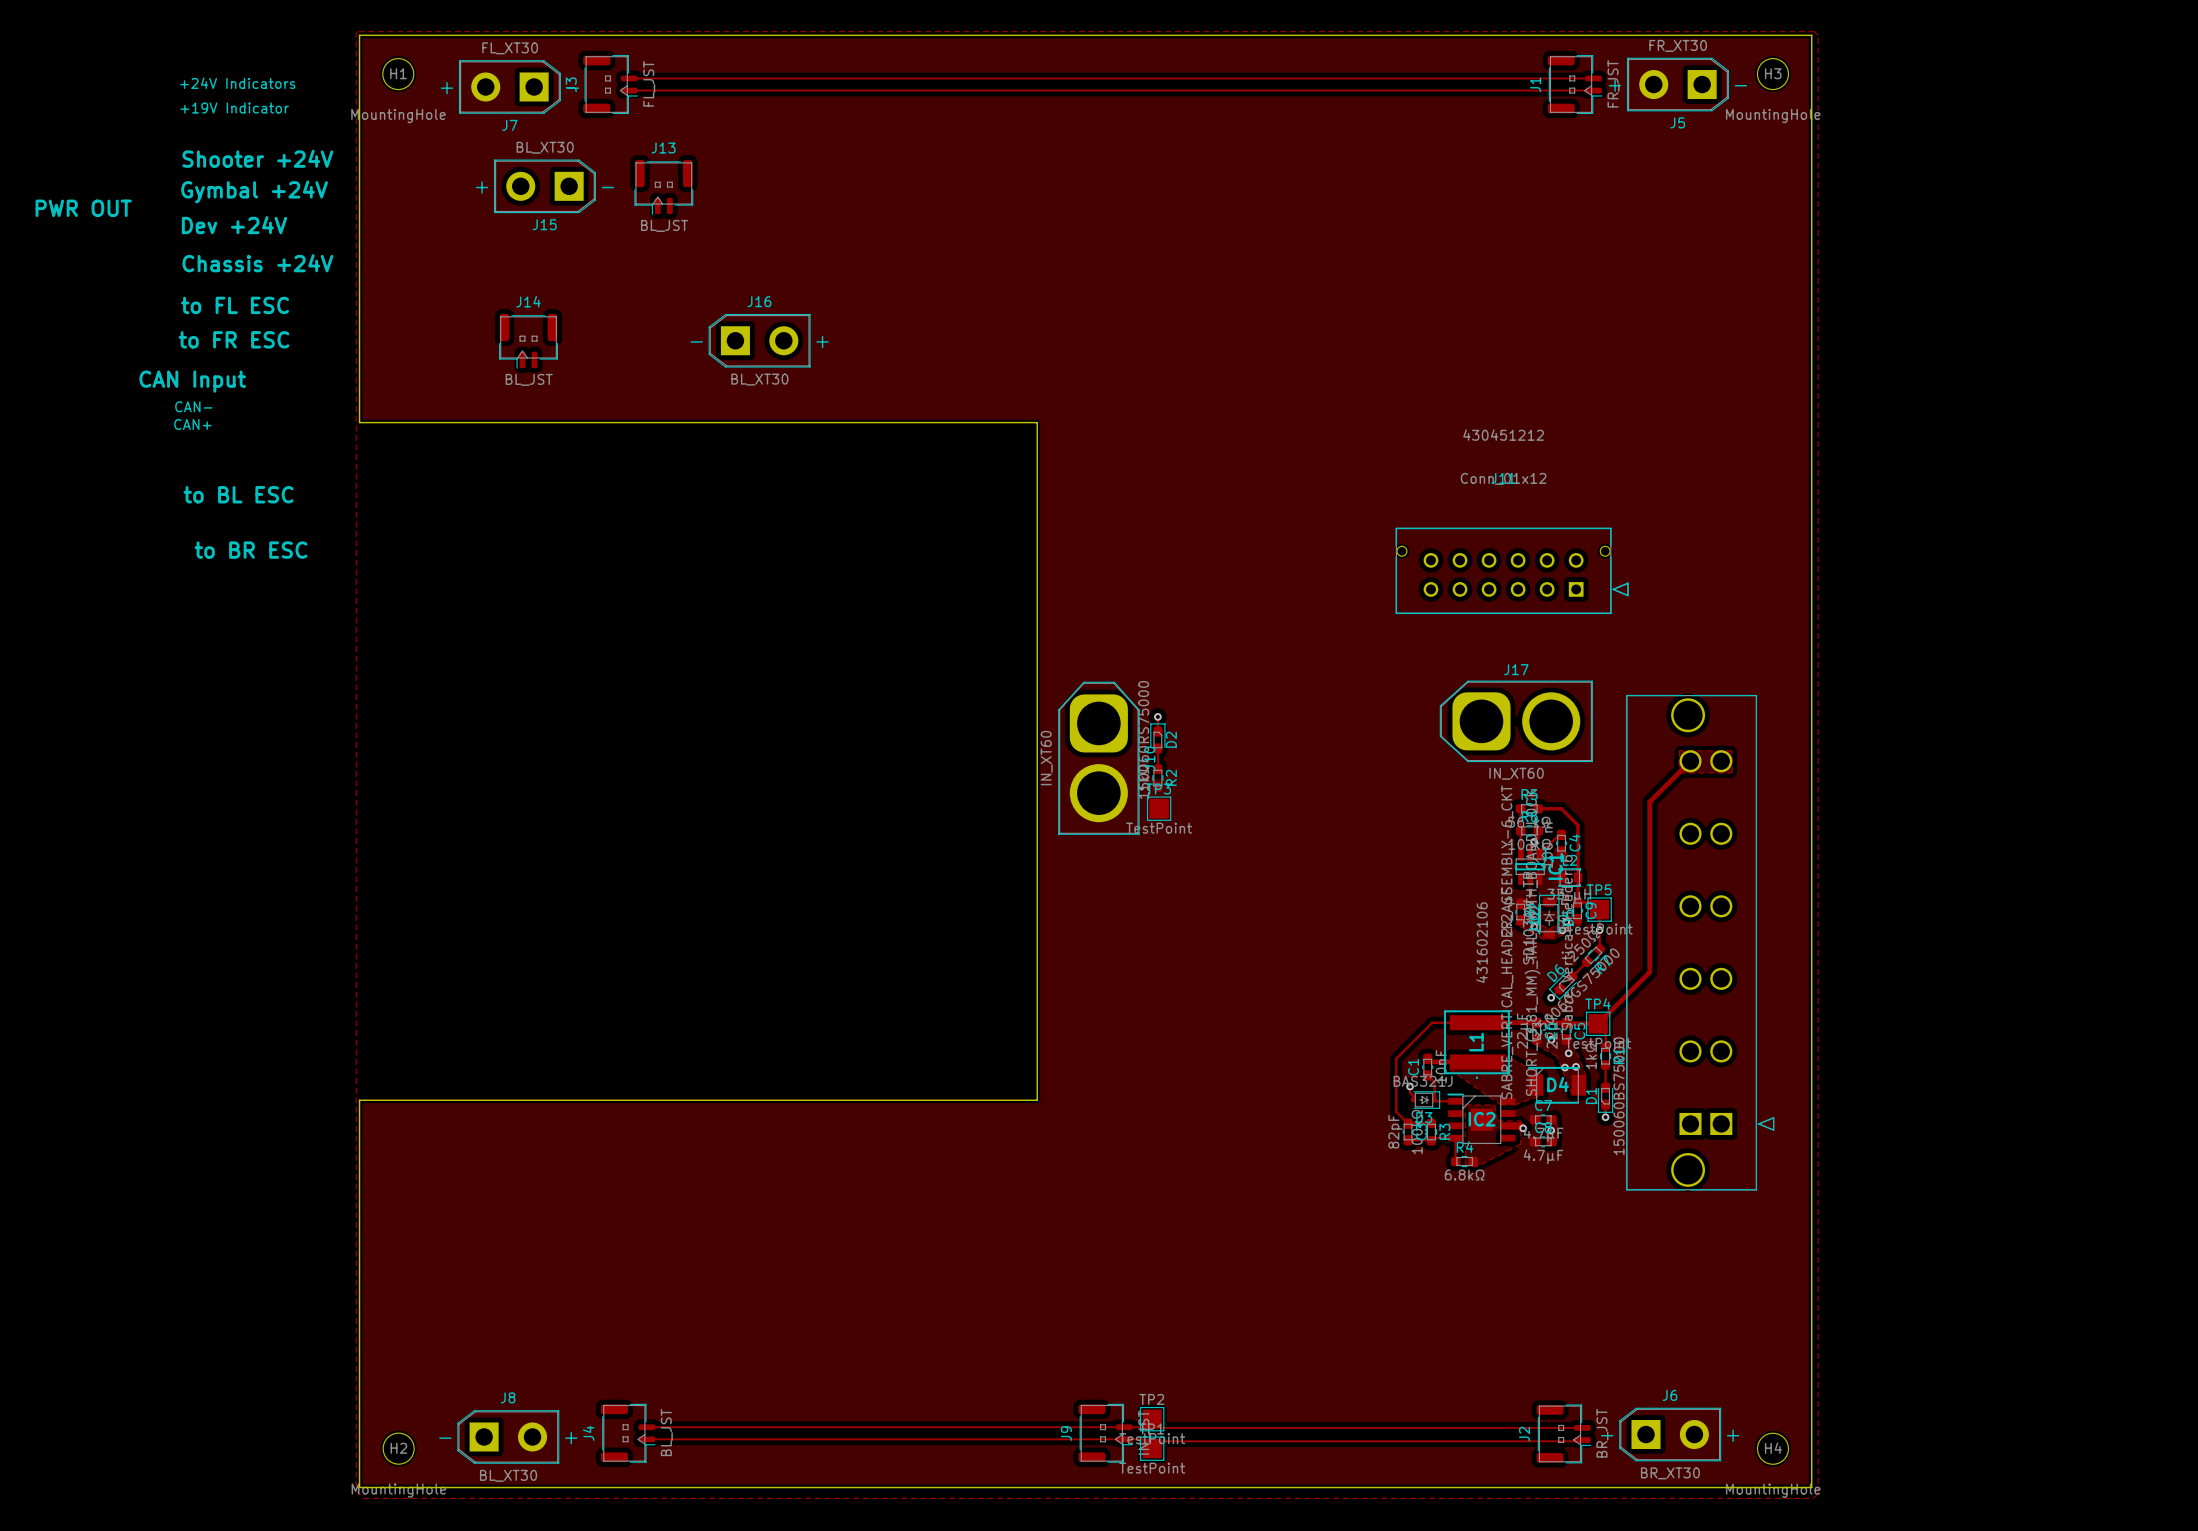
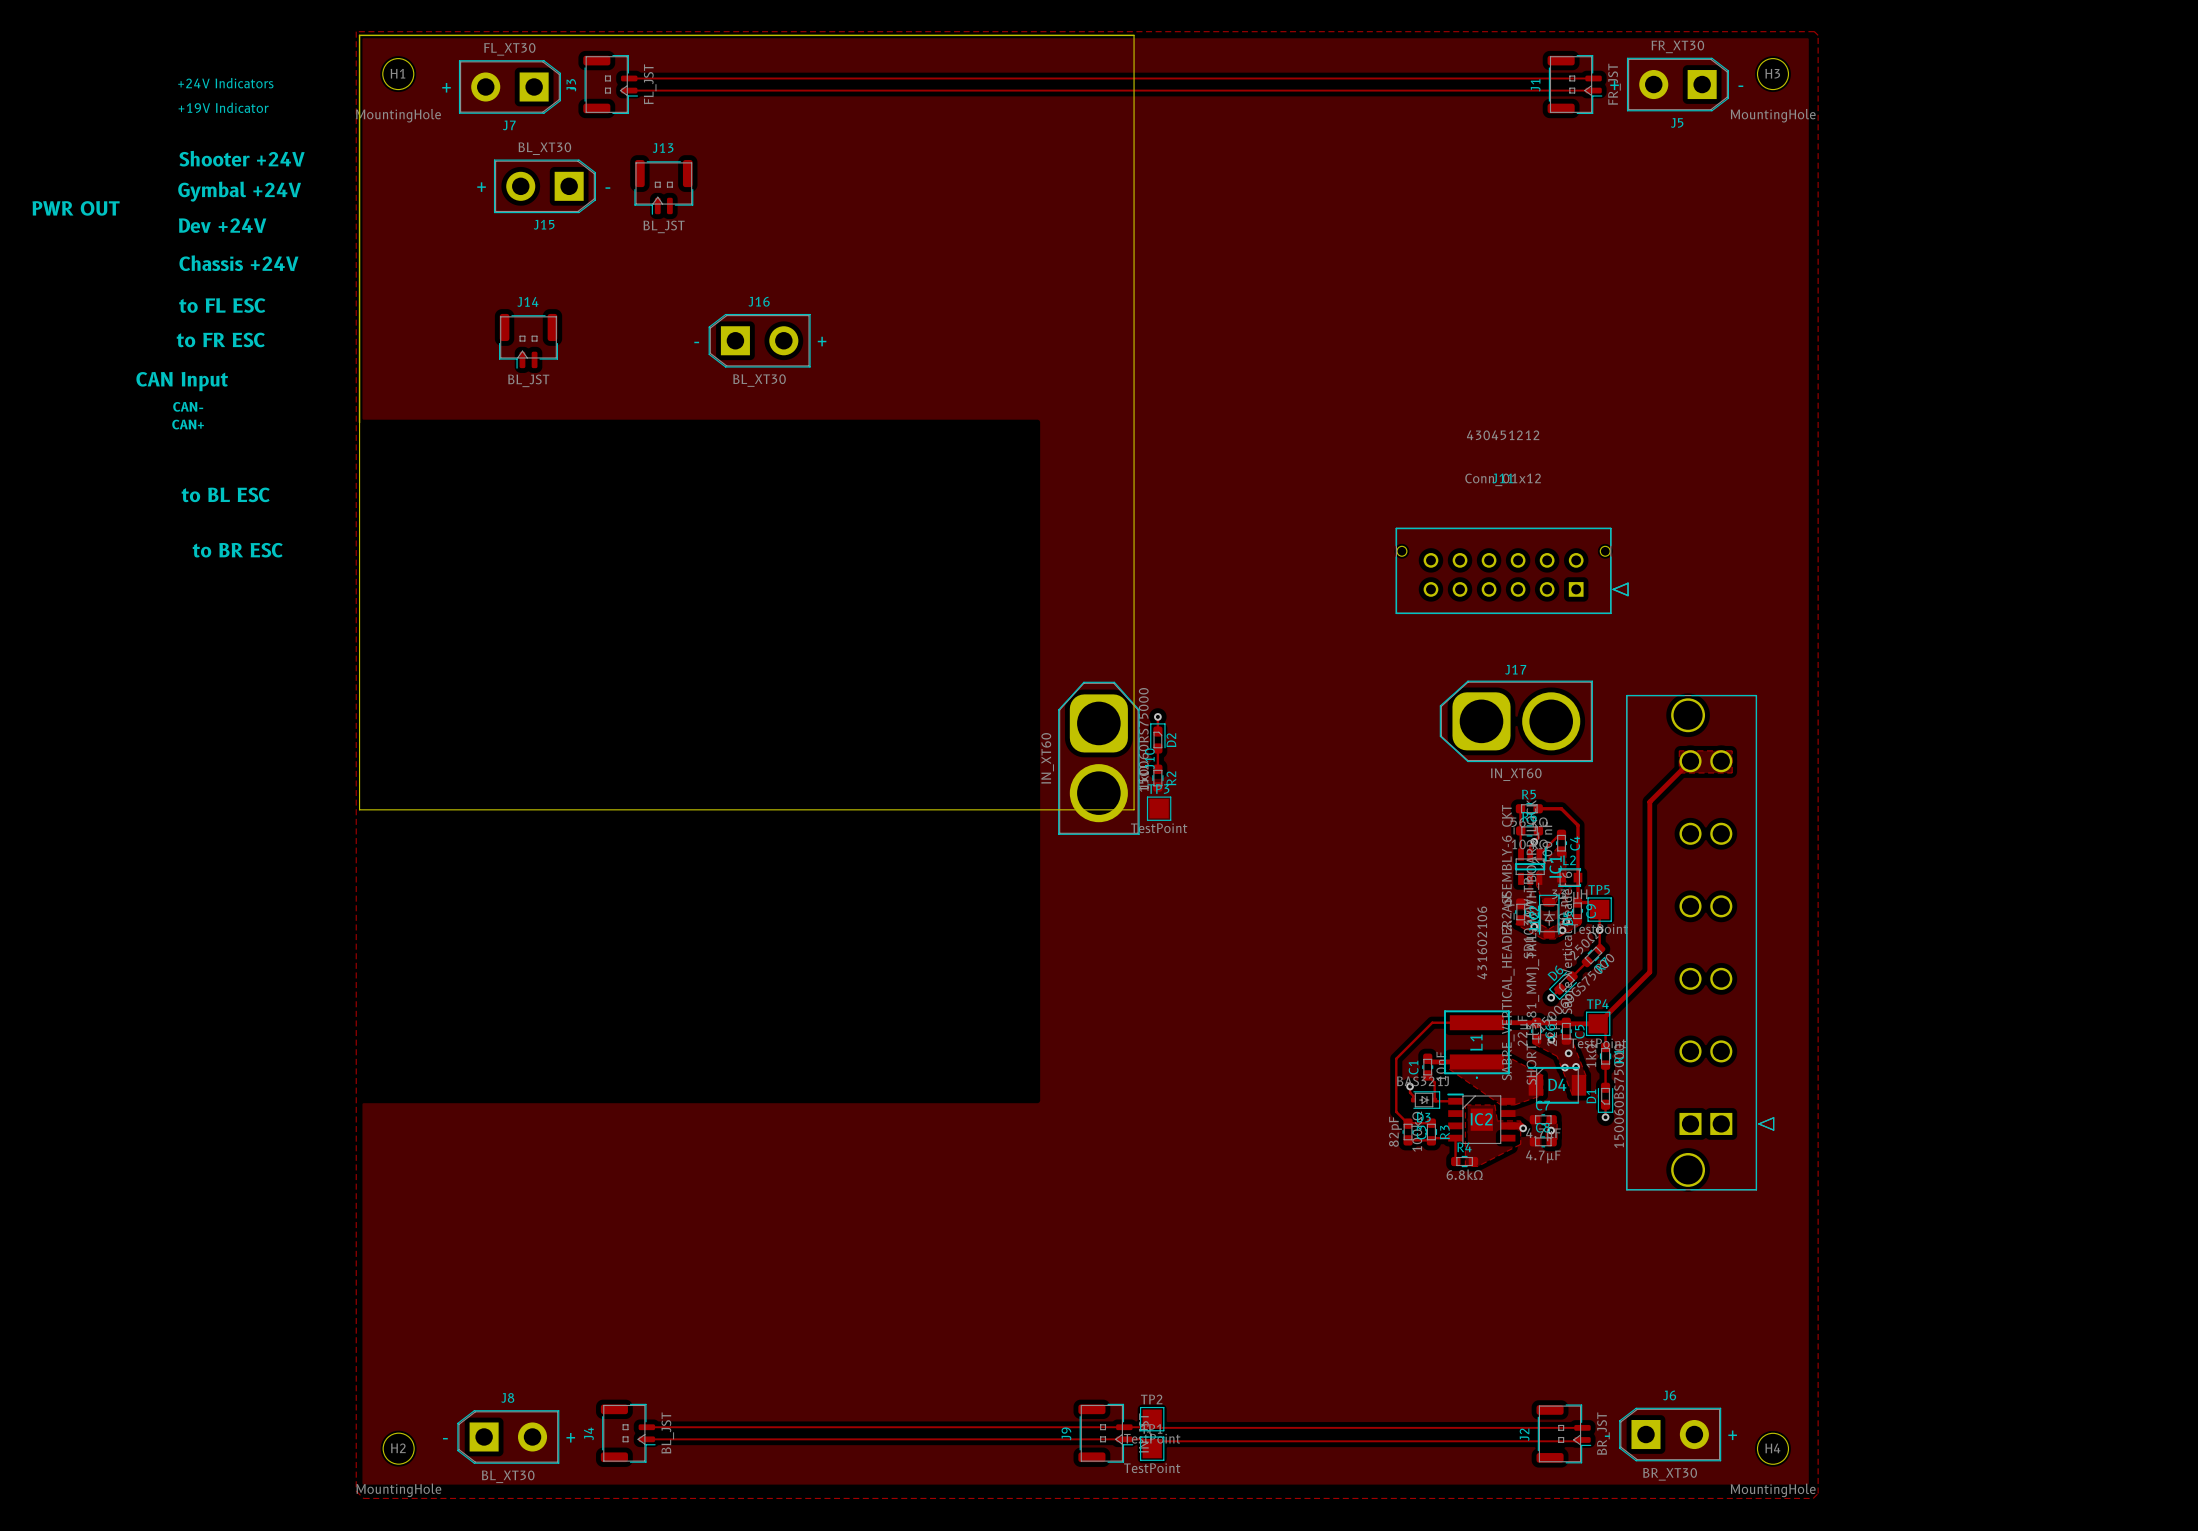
board edge: (1134, 35) (1811, 35) (1811, 1487) (359, 1487) (359, 1100) (1037, 1100) (1037, 422) (359, 422) -> (1134, 35) (1134, 809) (359, 809) (359, 422)

